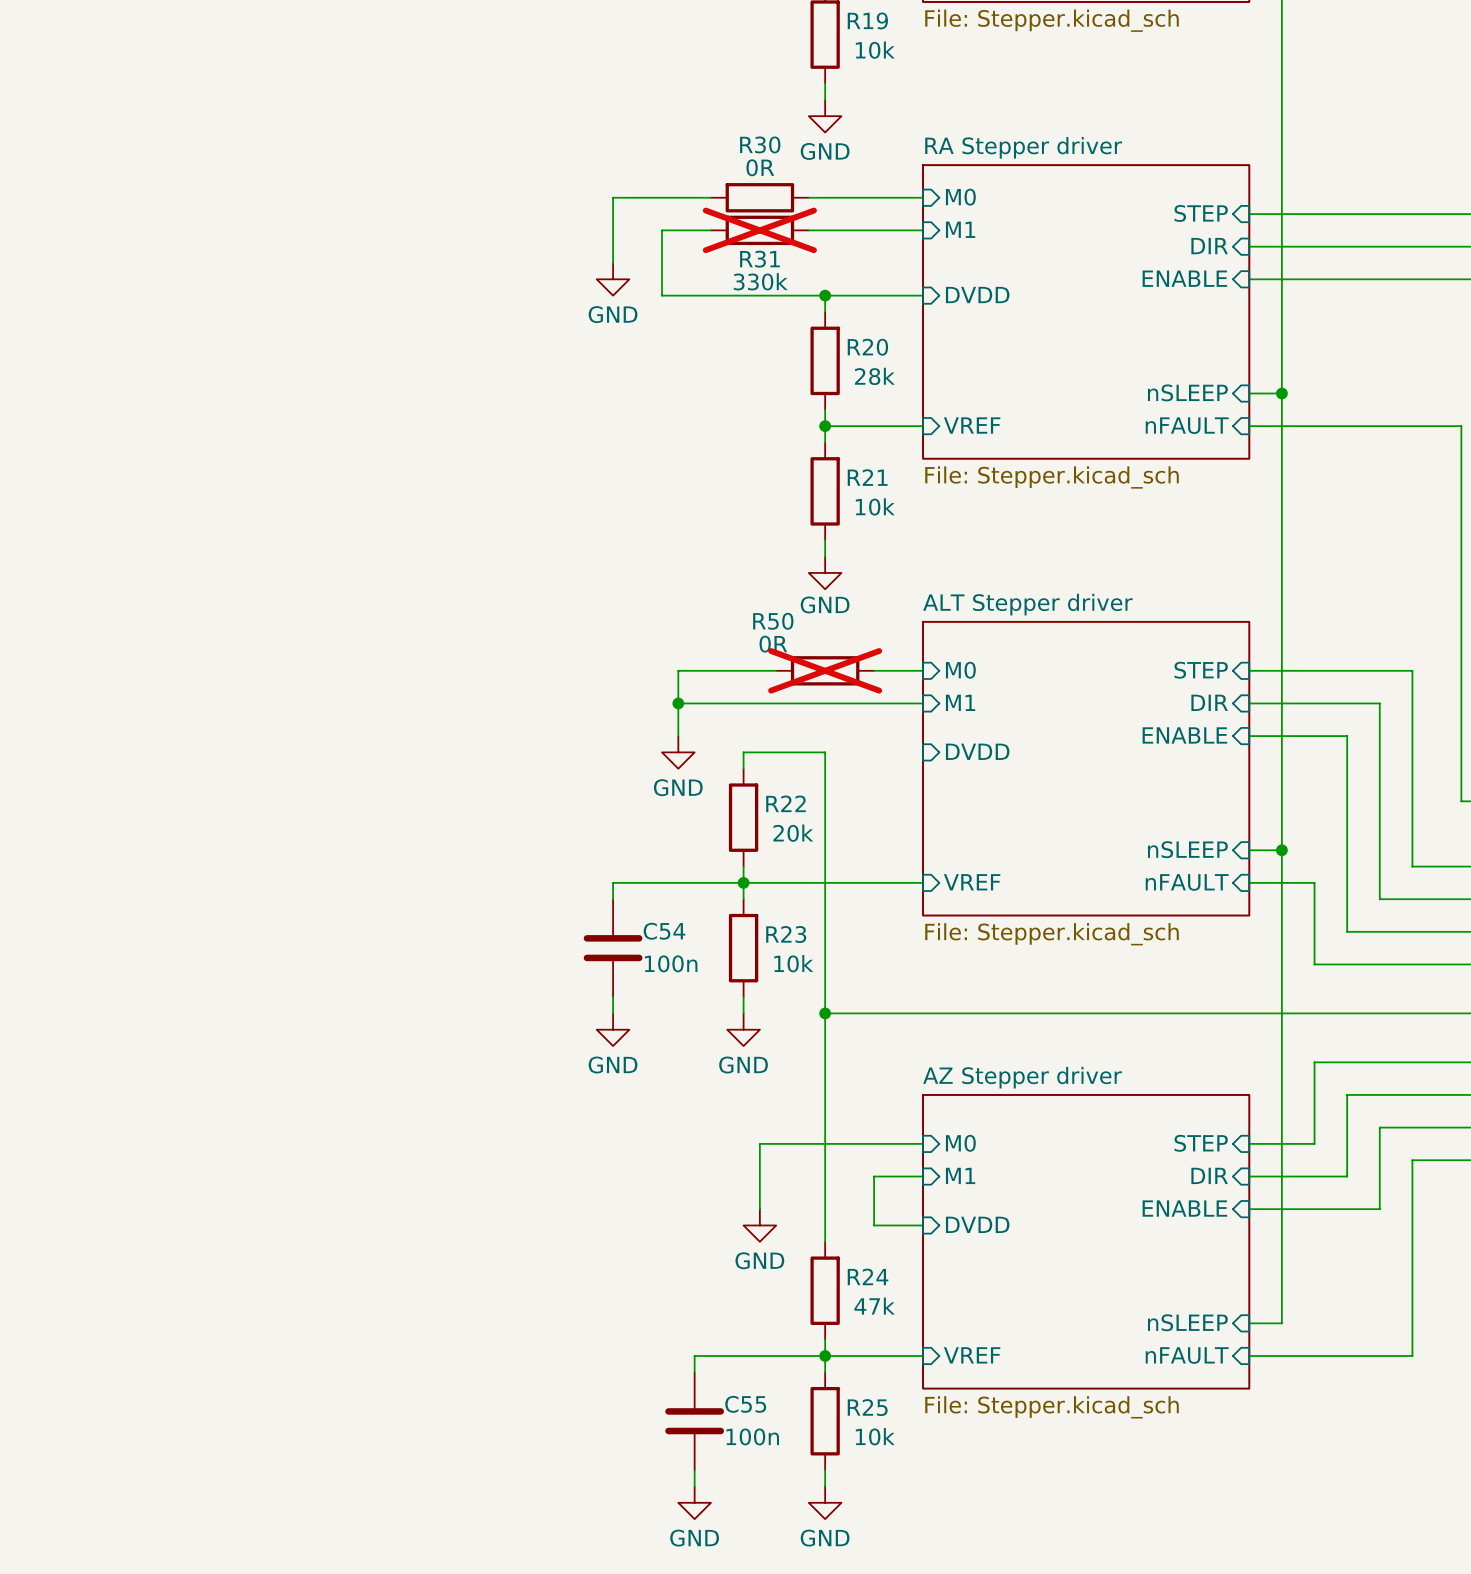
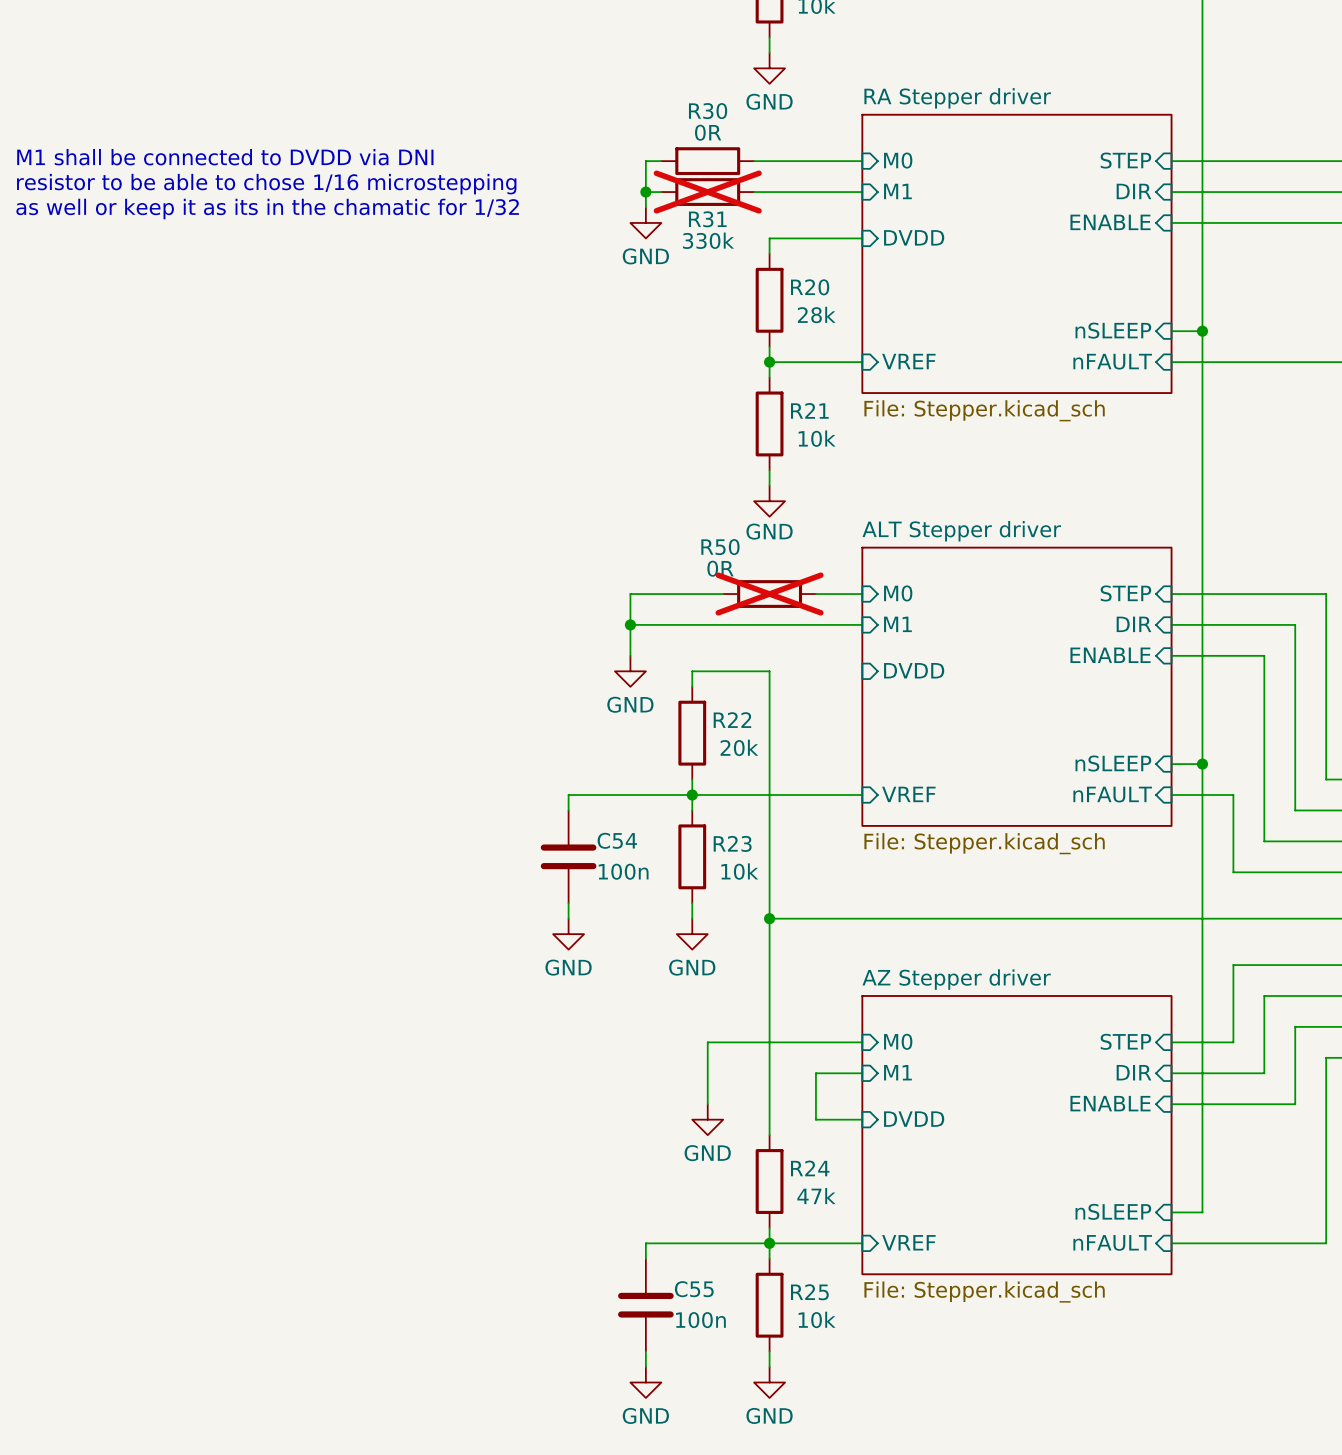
wire: (710, 197) (613, 197) (613, 263) -> none
R30 position: (759, 197) -> (707, 161)
wire: (808, 197) (923, 197) -> (754, 161) (862, 161)
sheet pin position: M0 (960, 197) -> M0 (898, 160)
text: none -> M1 shall be connected to DVDD via DNI (225, 157)
wire: none -> (661, 161) (645, 161) (645, 207)
sheet pin position: M1 (960, 229) -> M1 (897, 191)
wire: (710, 230) (662, 230) (662, 295) (825, 295) -> none
R31 position: (759, 230) -> (707, 192)
wire: (808, 230) (923, 230) -> (754, 192) (862, 192)
text: none -> resistor to be able to chose 1/16 microstepping (266, 184)
wire: none -> (645, 192) (661, 192)
junction: none -> (645, 192)
text: none -> as well or keep it as its in the chamatic for 1/32 (267, 209)
power symbol position: GND (613, 279) -> GND (645, 222)
junction: (825, 295) -> none

